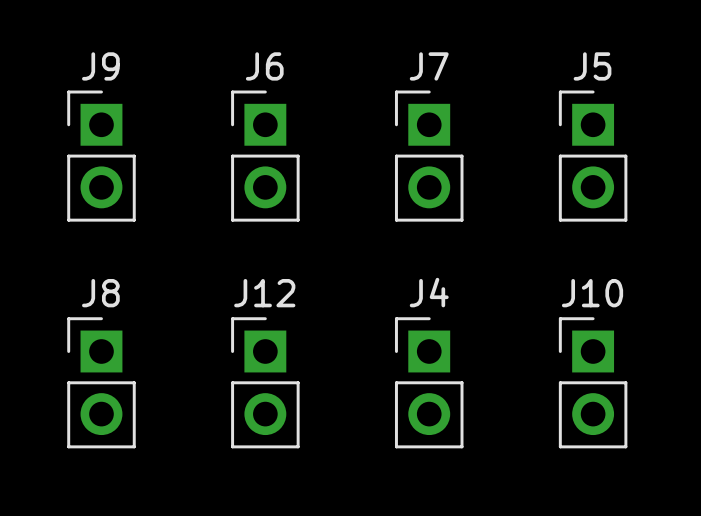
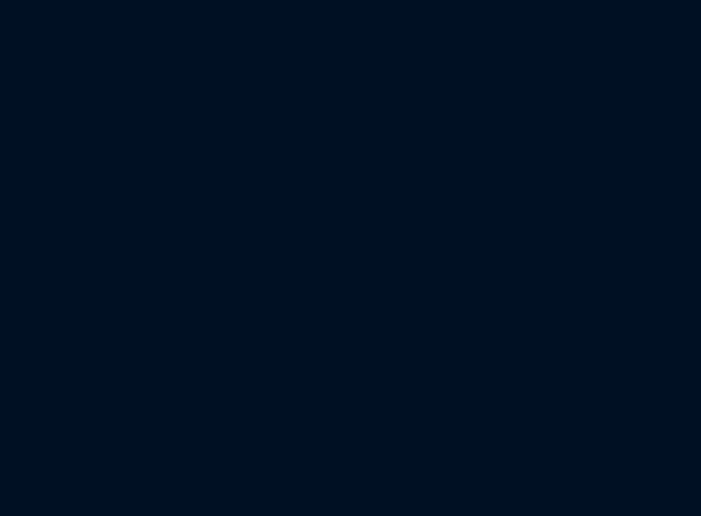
J9: (101, 156) -> none
J6: (265, 156) -> none
J7: (429, 156) -> none
J5: (593, 156) -> none
J8: (101, 382) -> none
J12: (265, 382) -> none
J4: (429, 382) -> none
J10: (593, 382) -> none

